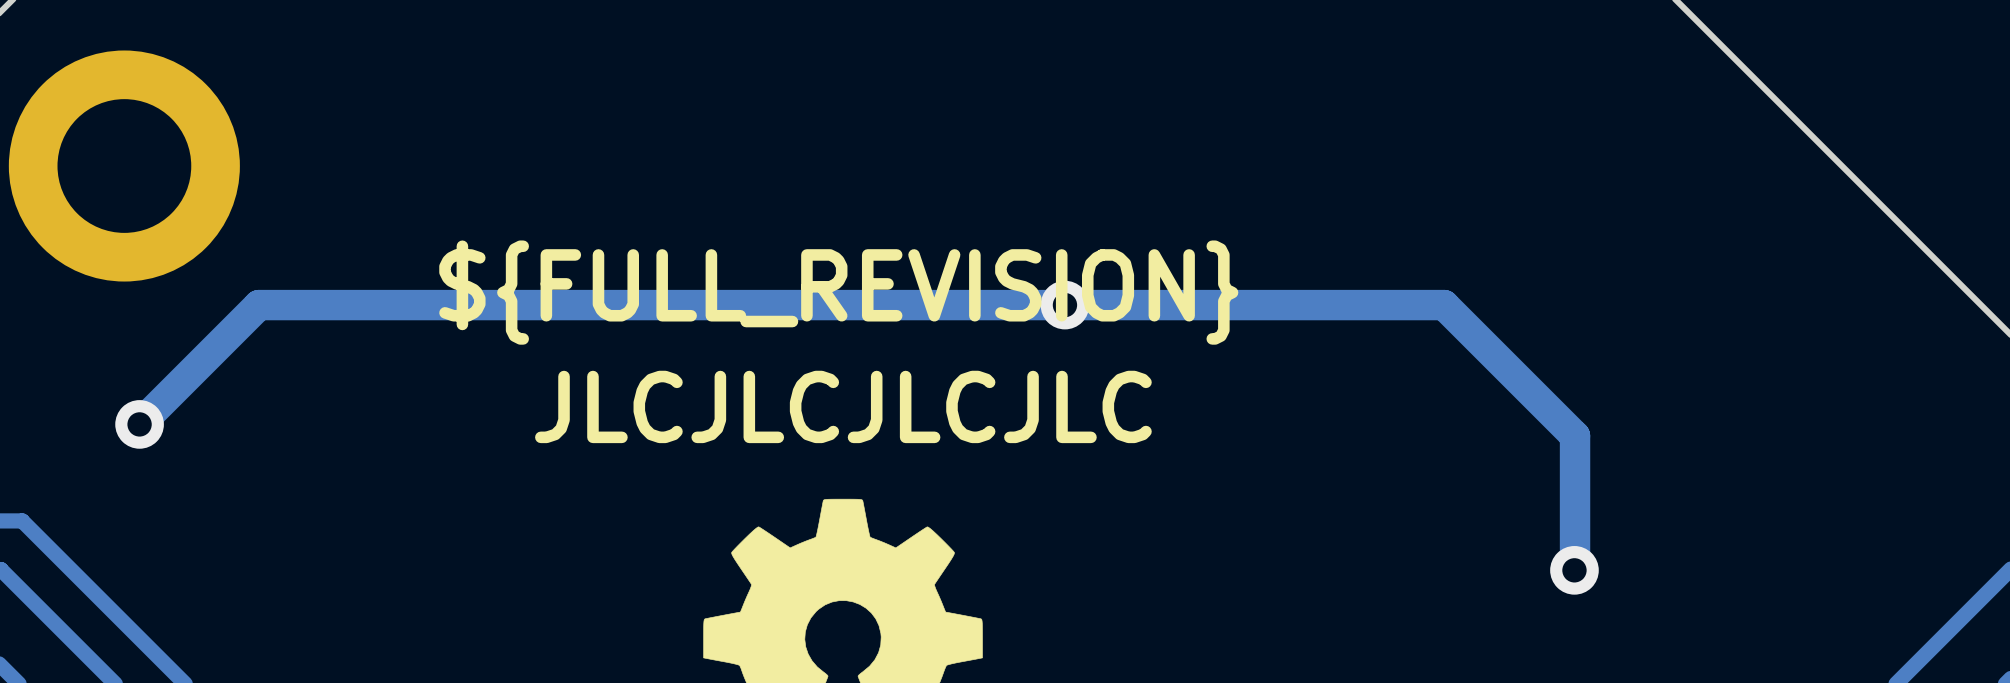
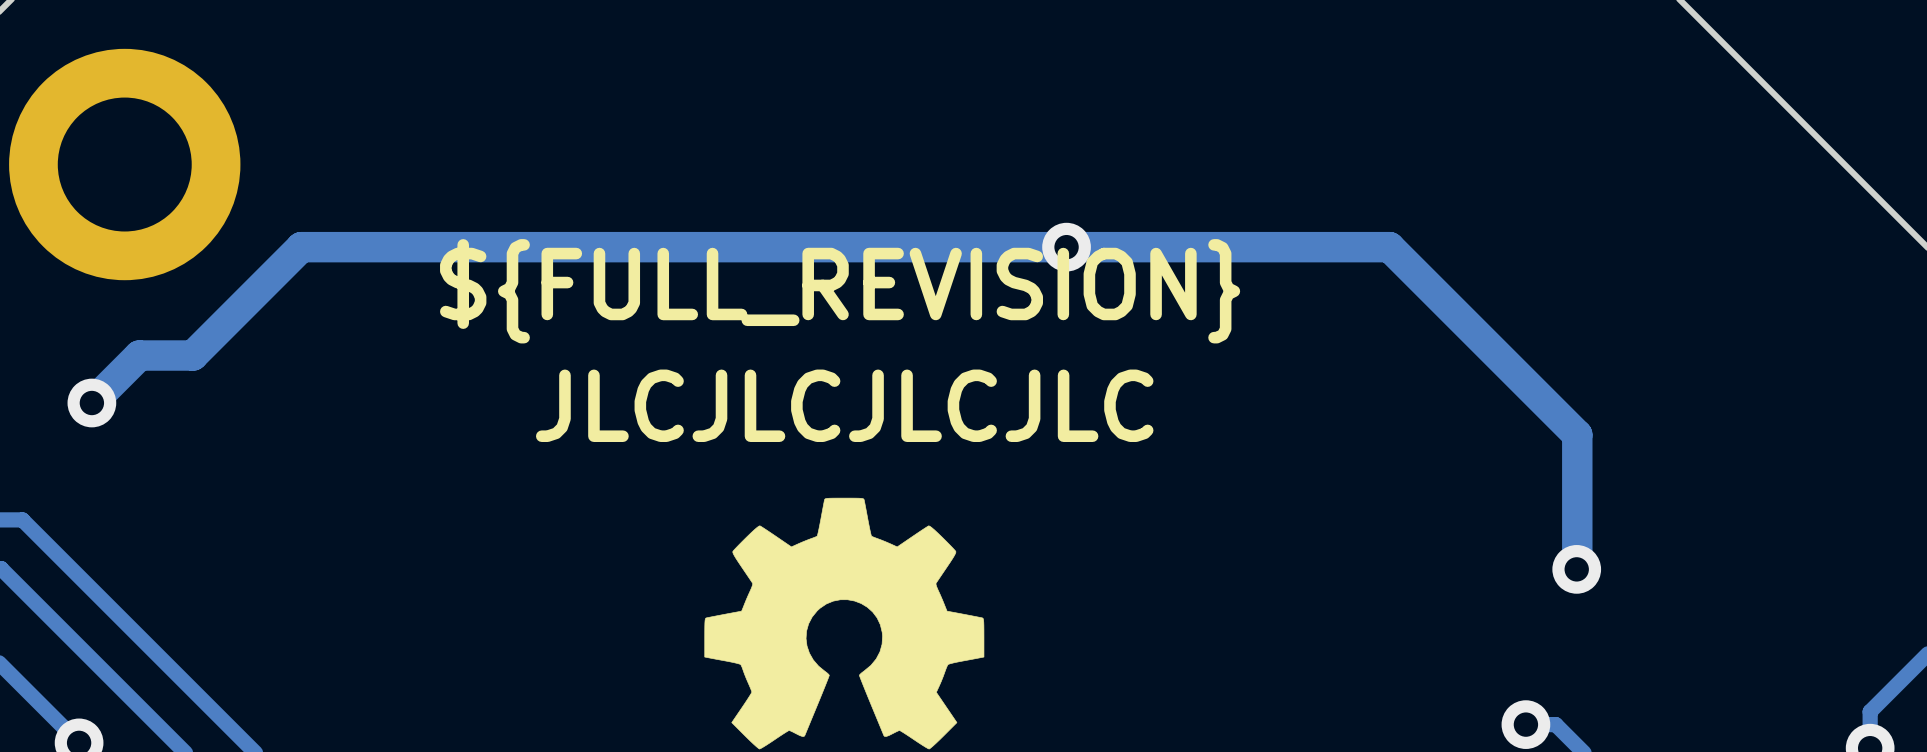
via position: (1064, 305) -> (1066, 247)
track: (1444, 305) (258, 305) (139, 424) -> (1446, 303) (1389, 247) (301, 247) (192, 355) (139, 355) (91, 403)
via position: (139, 424) -> (91, 403)

